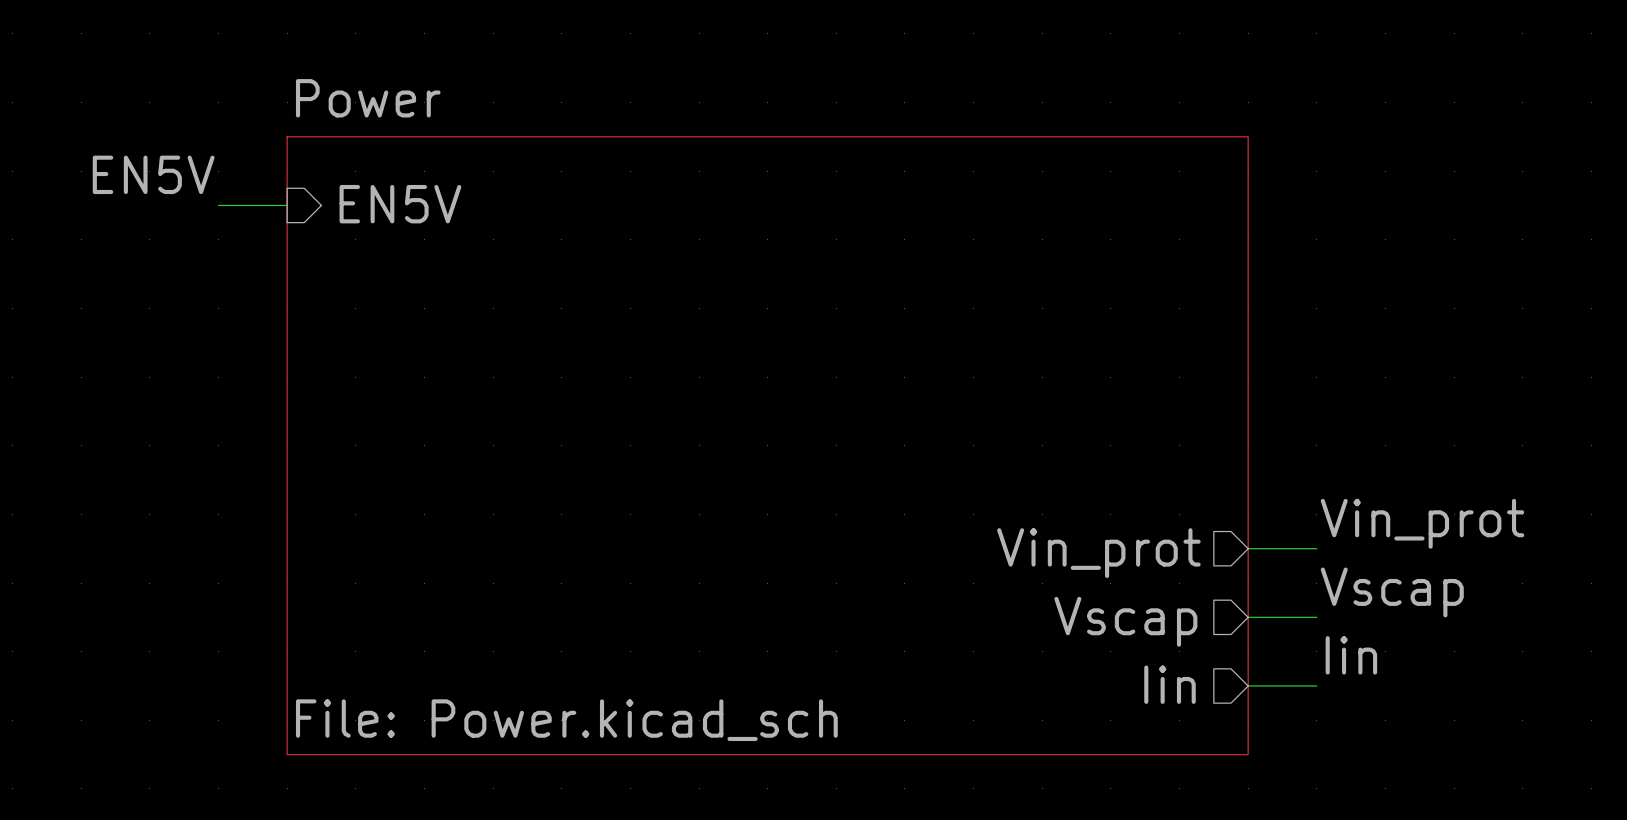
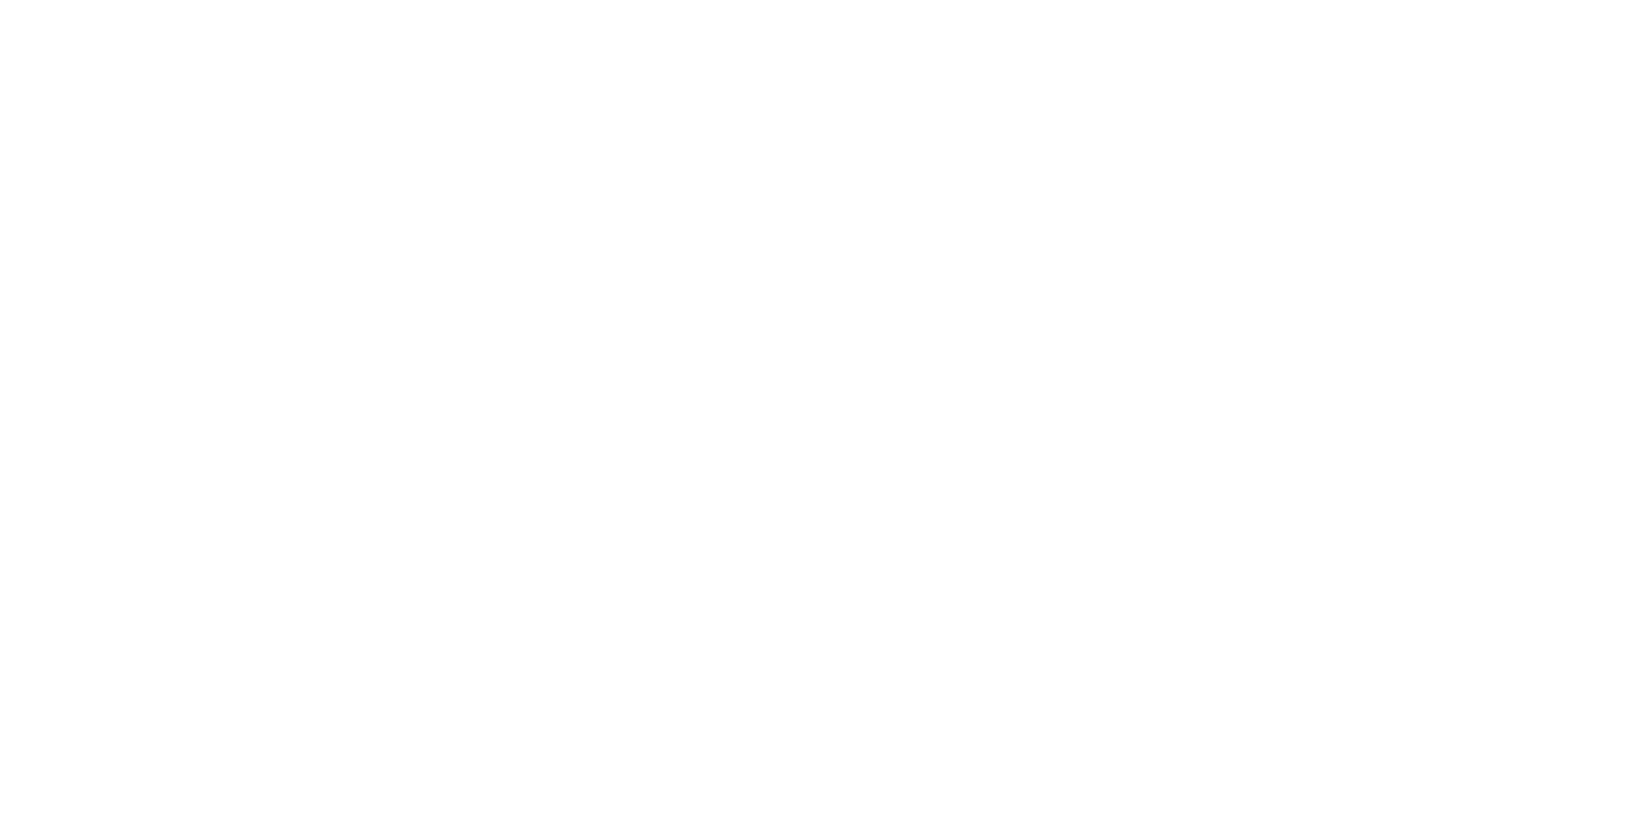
label: EN5V (153, 174) -> none
sheet pin: EN5V (400, 204) -> none
wire: (218, 205) (287, 205) -> none
sheet Power: File: Power.kicad_sch (767, 445) -> none
label: Vin_prot (1422, 523) -> none
wire: (1248, 548) (1316, 548) -> none
sheet pin: Vin_prot (1098, 553) -> none
label: Vscap (1392, 592) -> none
wire: (1248, 617) (1316, 617) -> none
sheet pin: Vscap (1125, 621) -> none
label: Iin (1351, 655) -> none
sheet pin: Iin (1170, 684) -> none
wire: (1248, 685) (1316, 685) -> none

